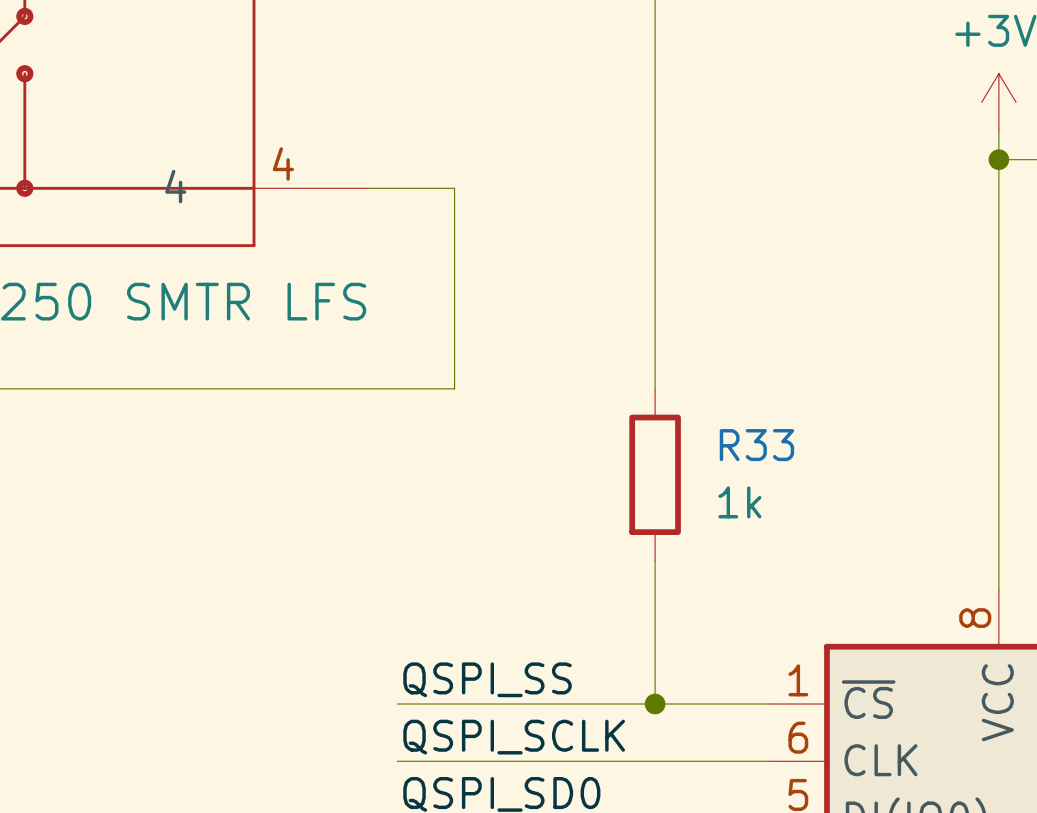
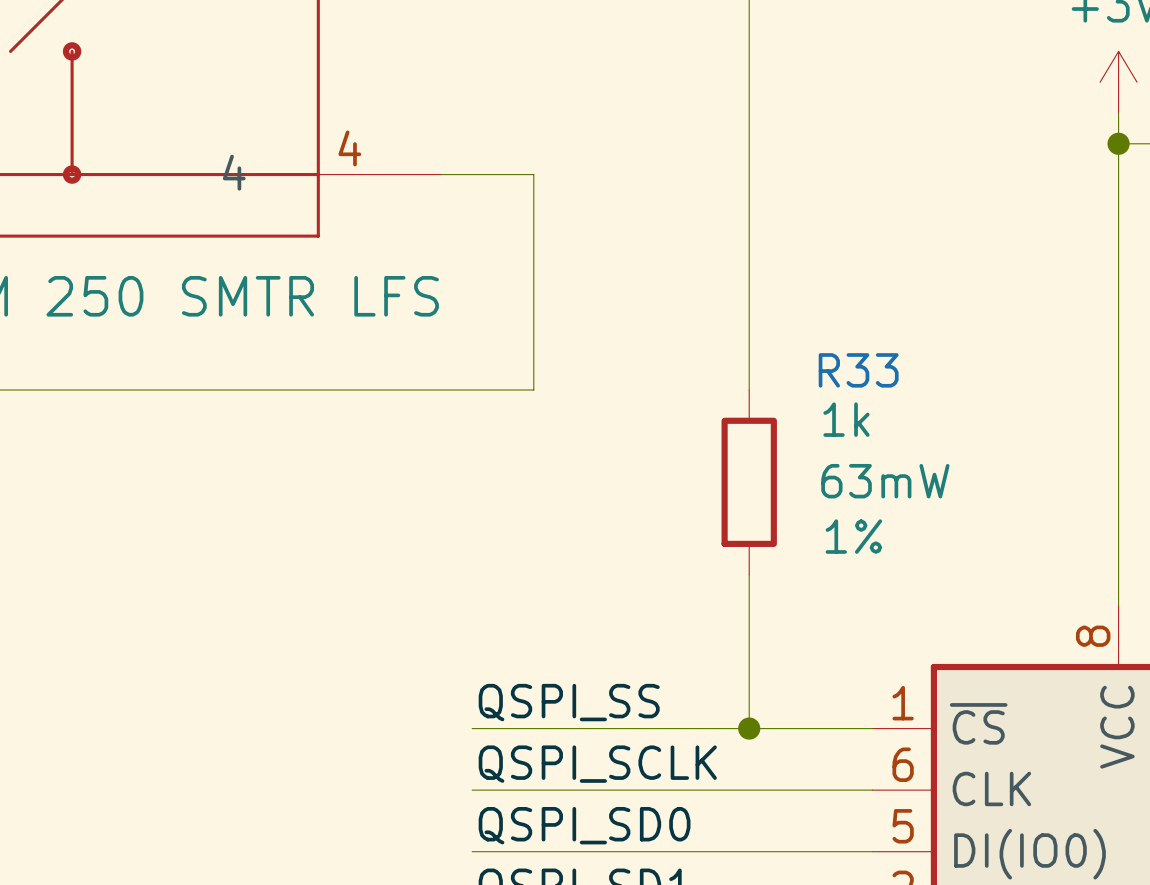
R33 name position: R33 (756, 445) -> R33 (858, 370)
R33 text: none -> 63mW (885, 481)
R33 value position: 1k (739, 502) -> 1k (846, 419)
R33 text: none -> 1% (853, 536)

